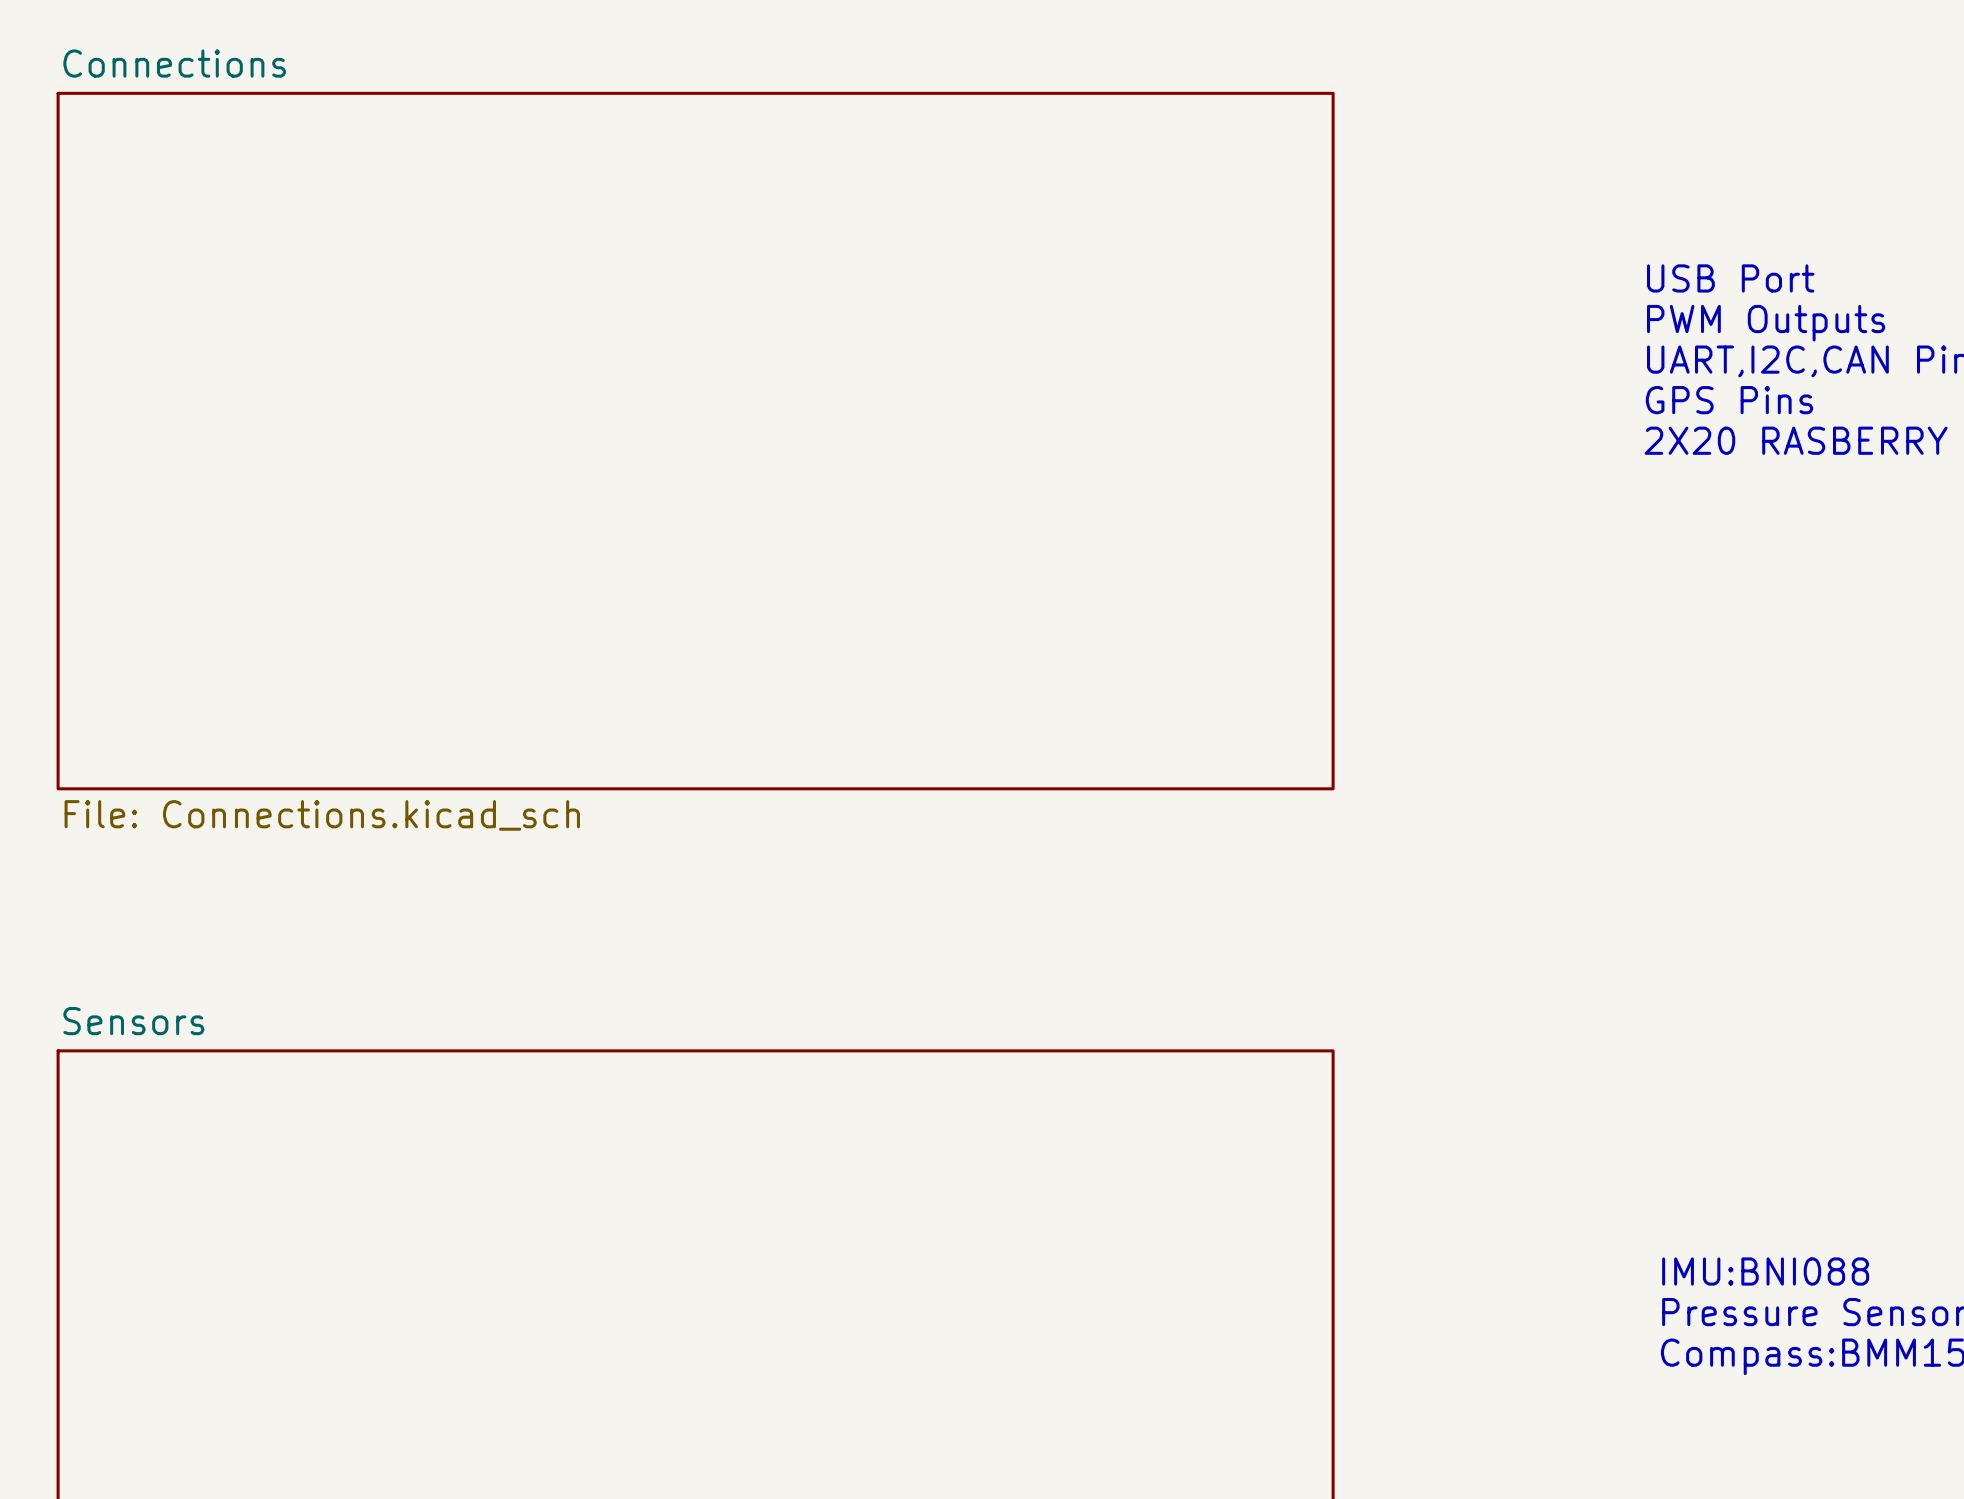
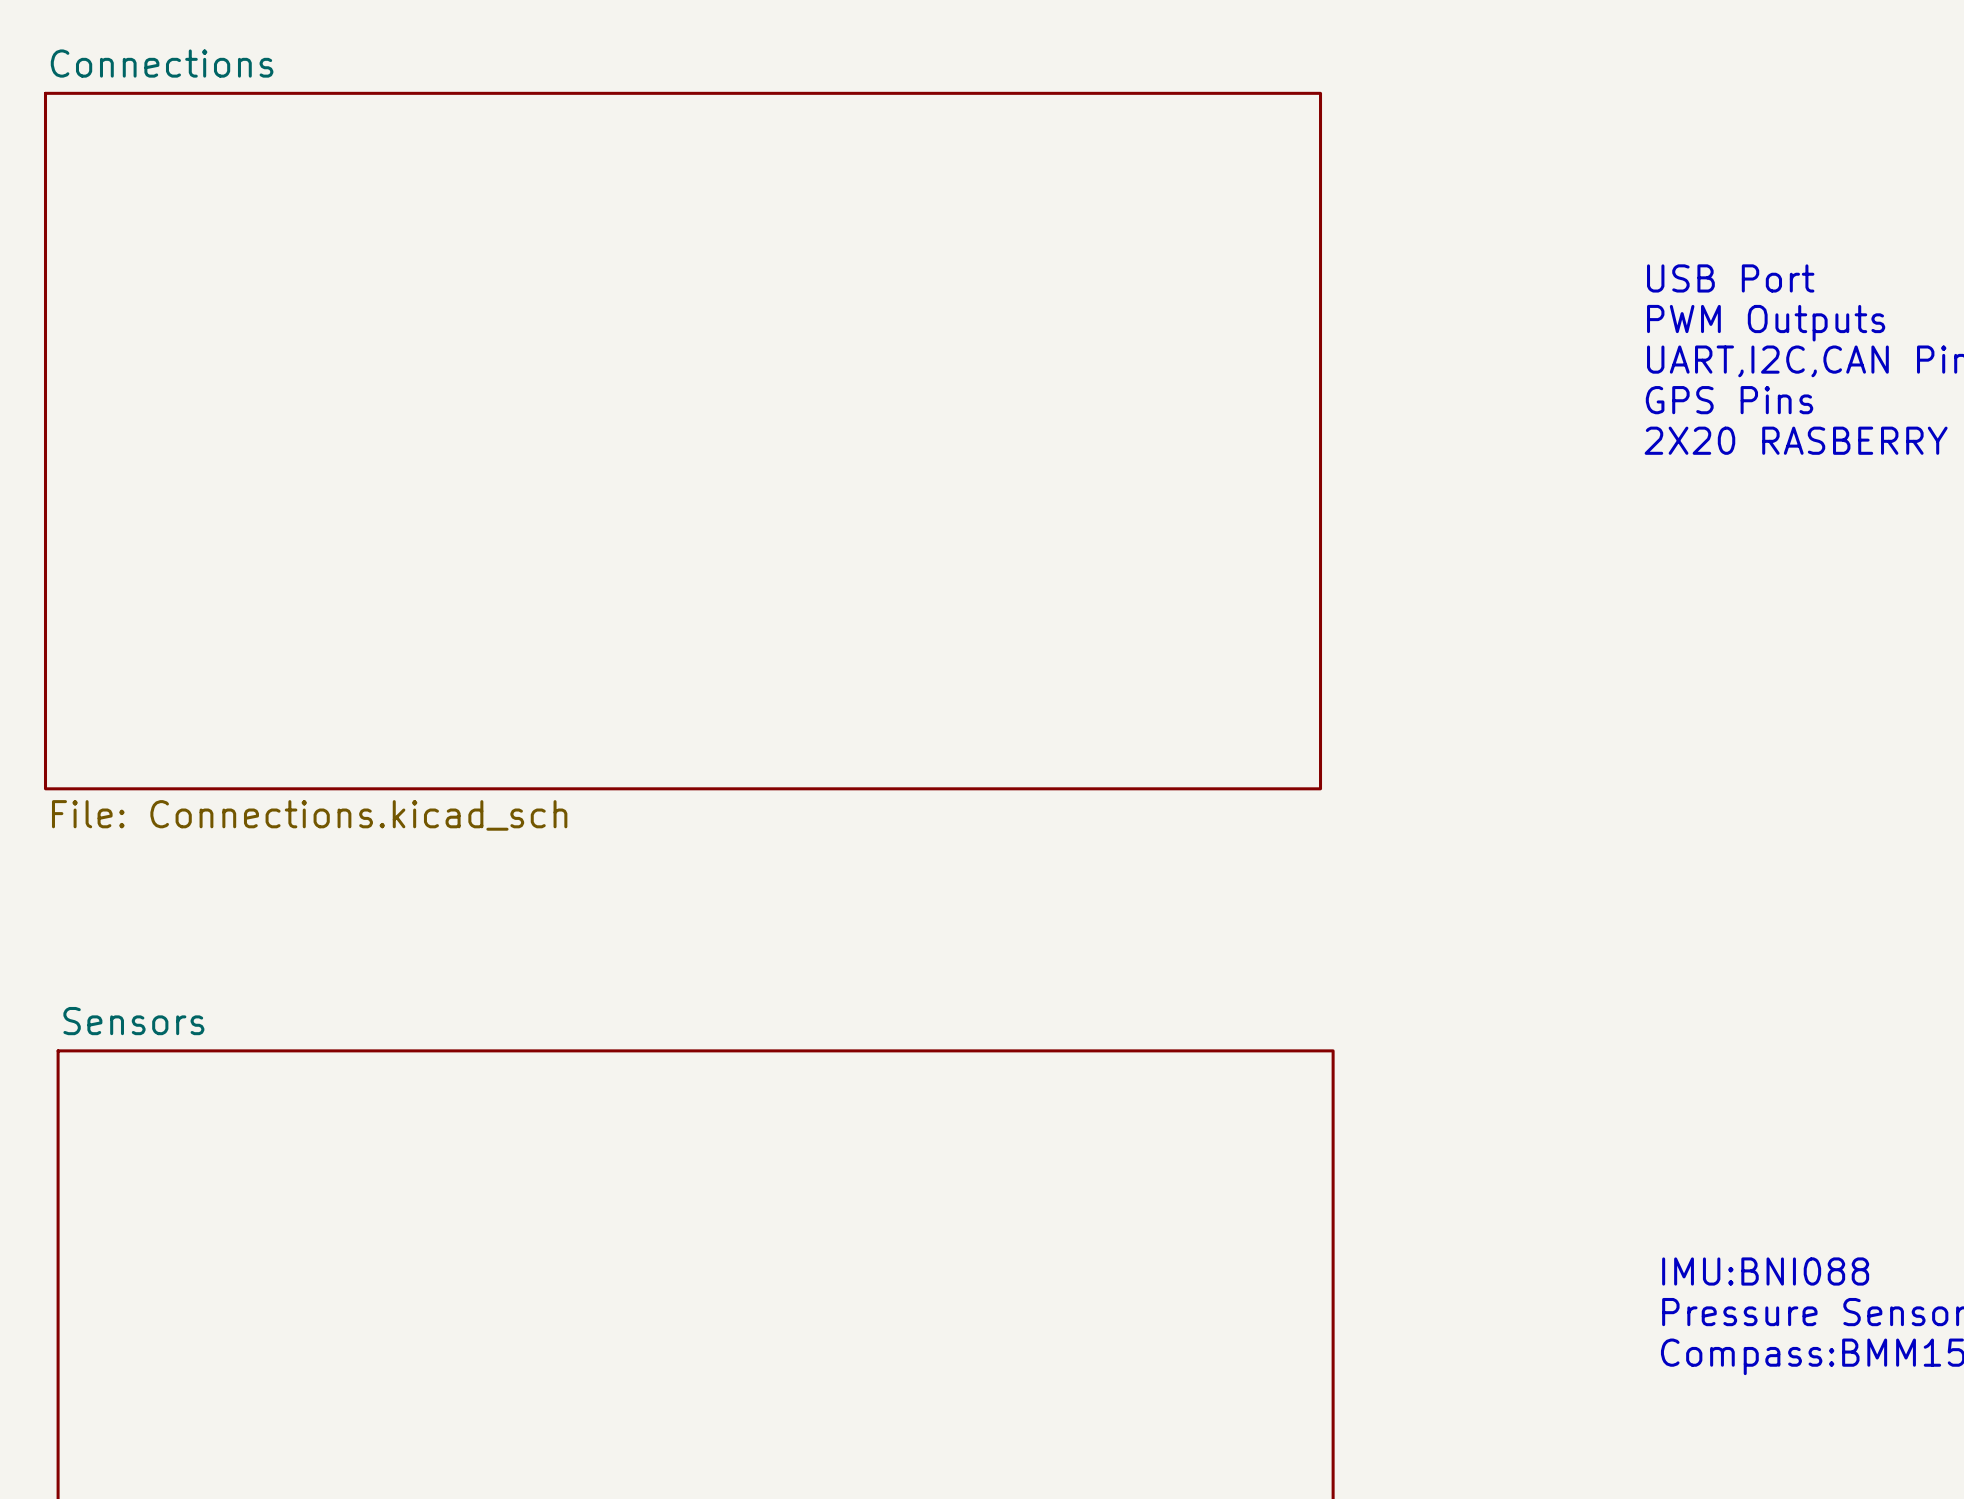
sheet Connections position: (695, 441) -> (683, 441)

